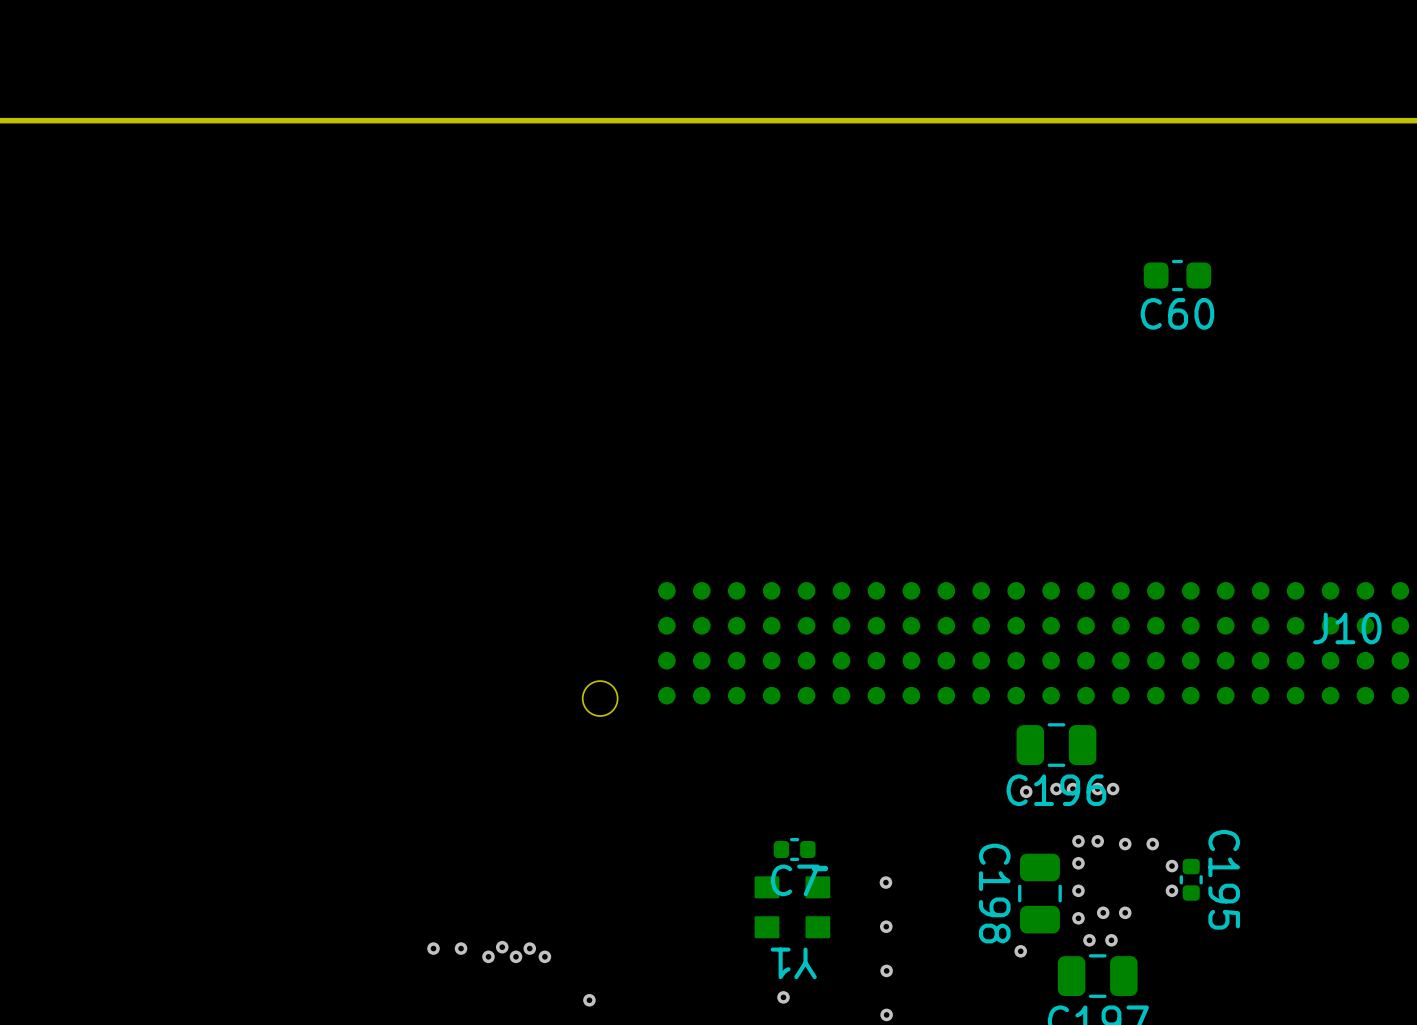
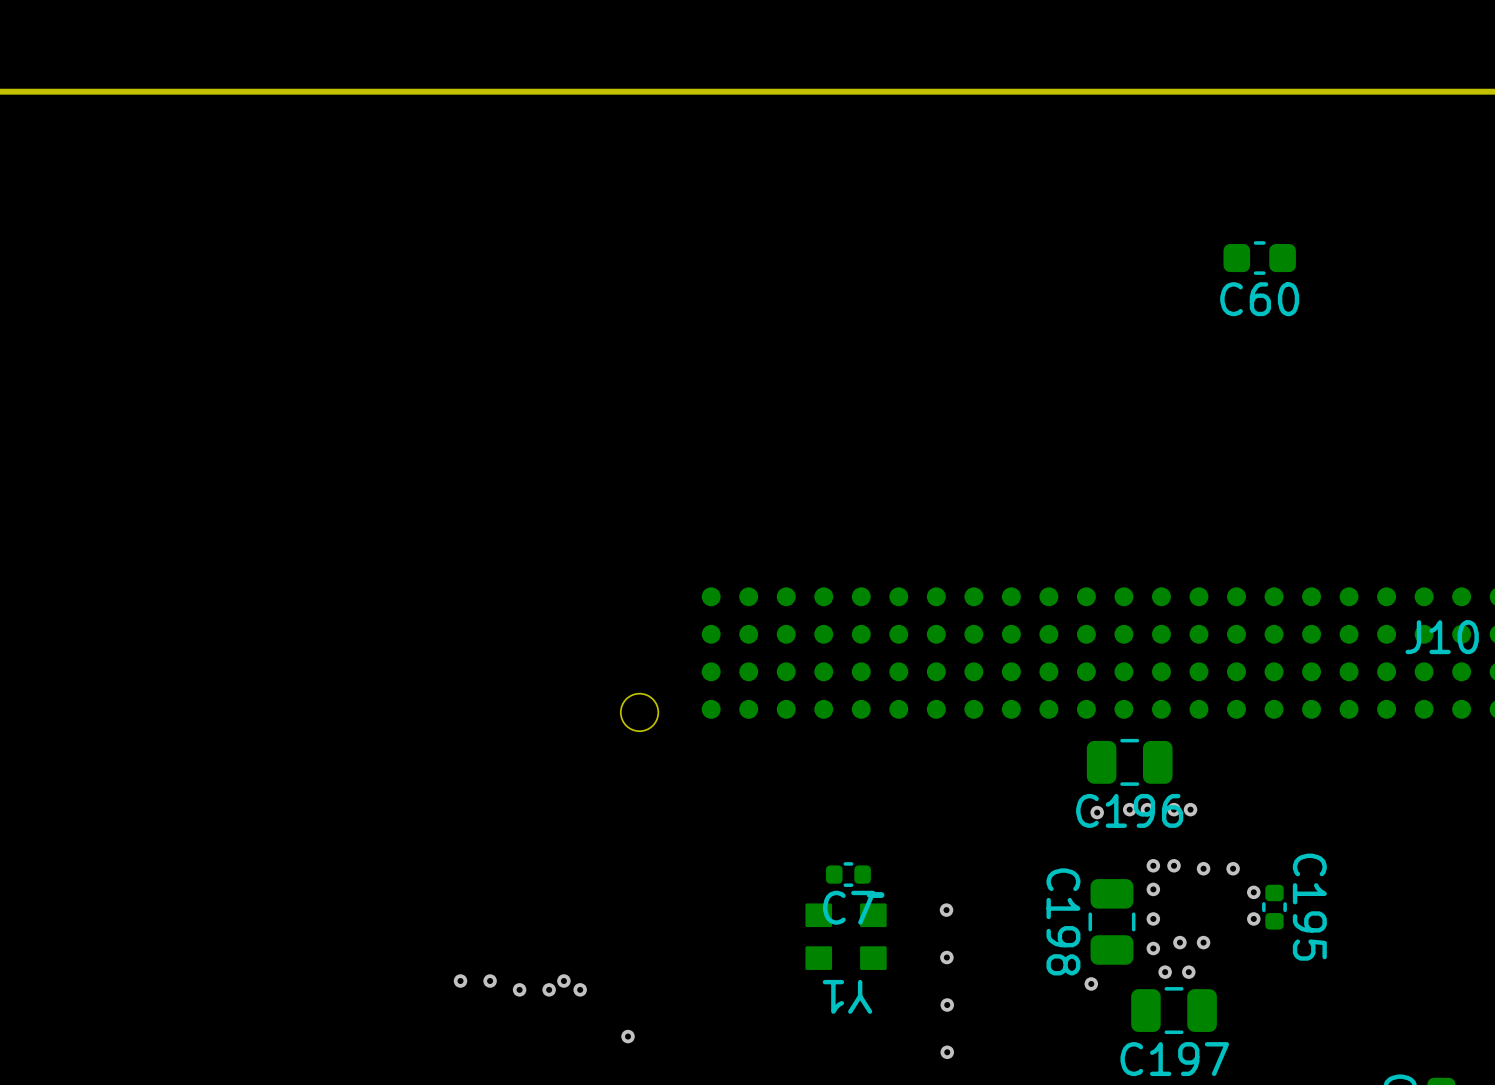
via: (502, 947) -> none
via: (783, 997) -> none

